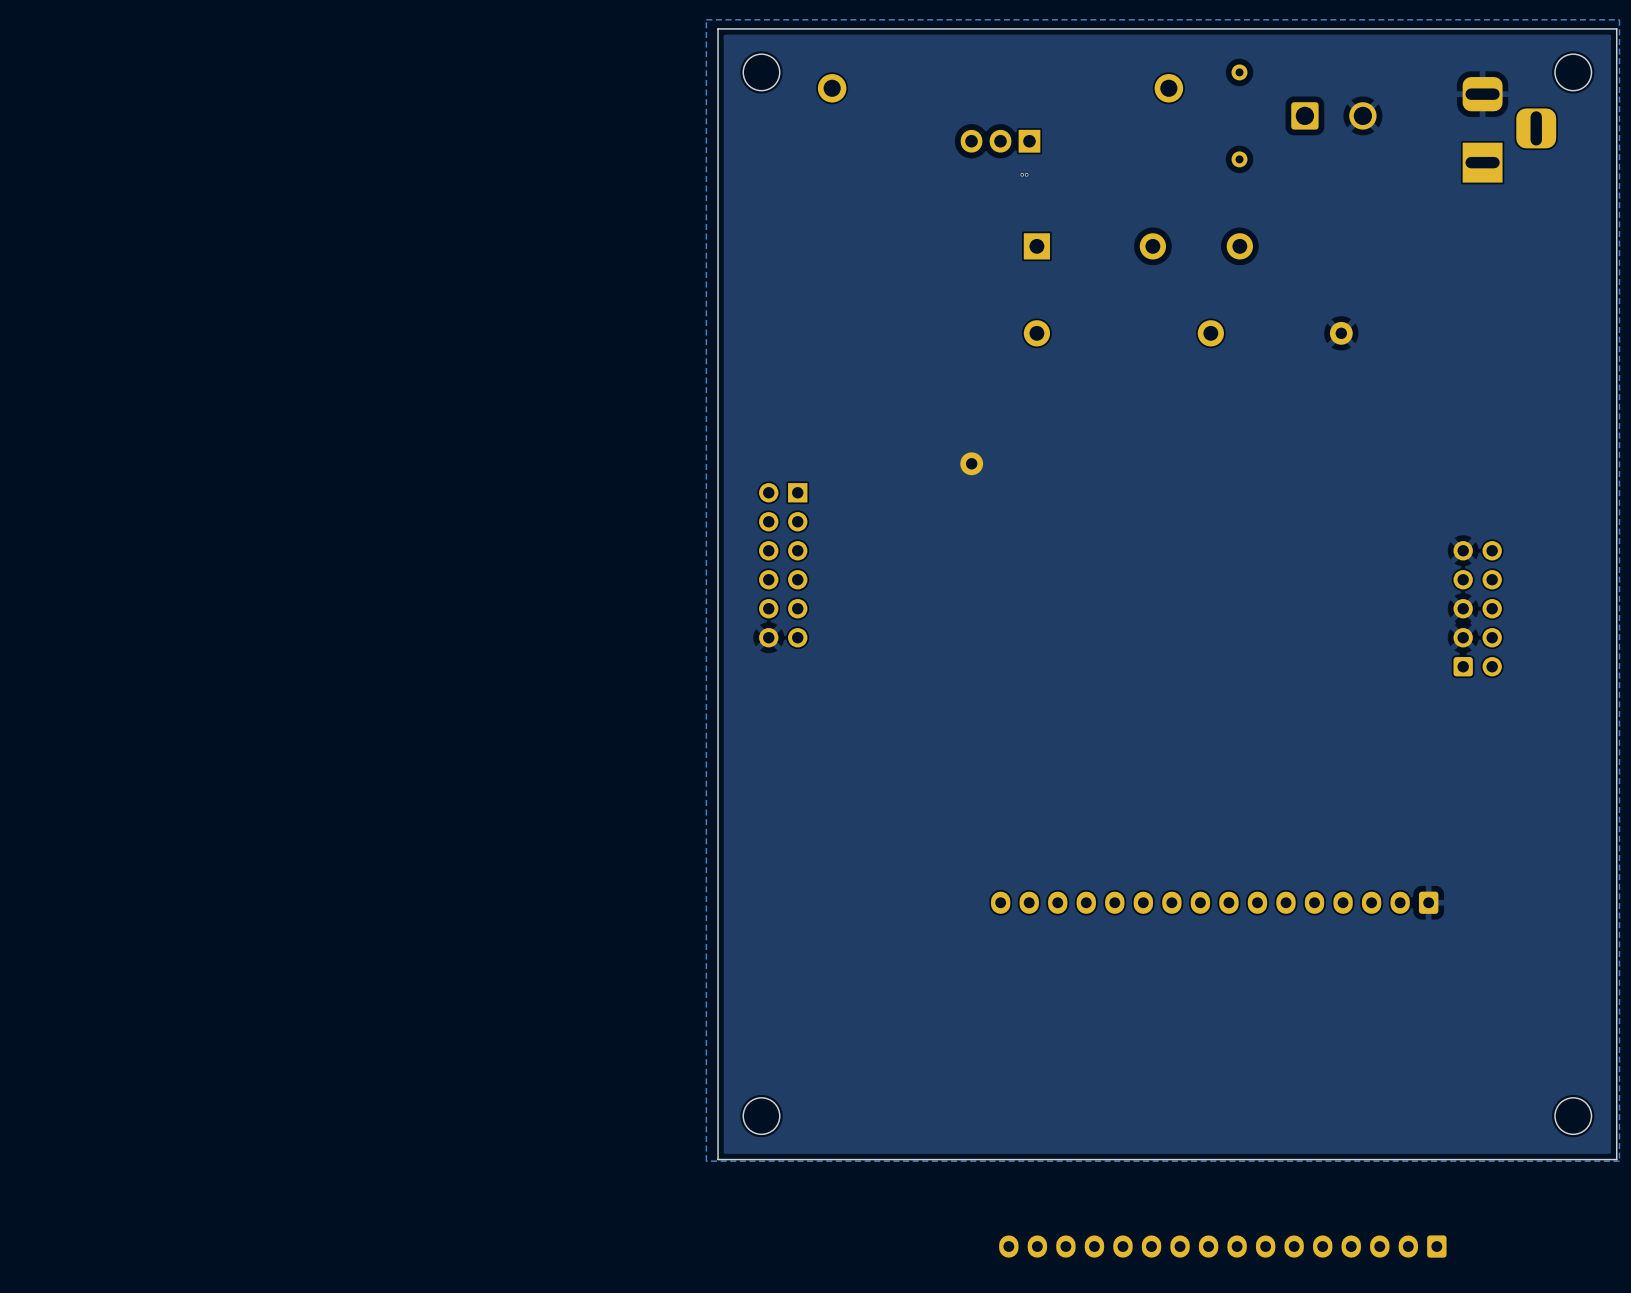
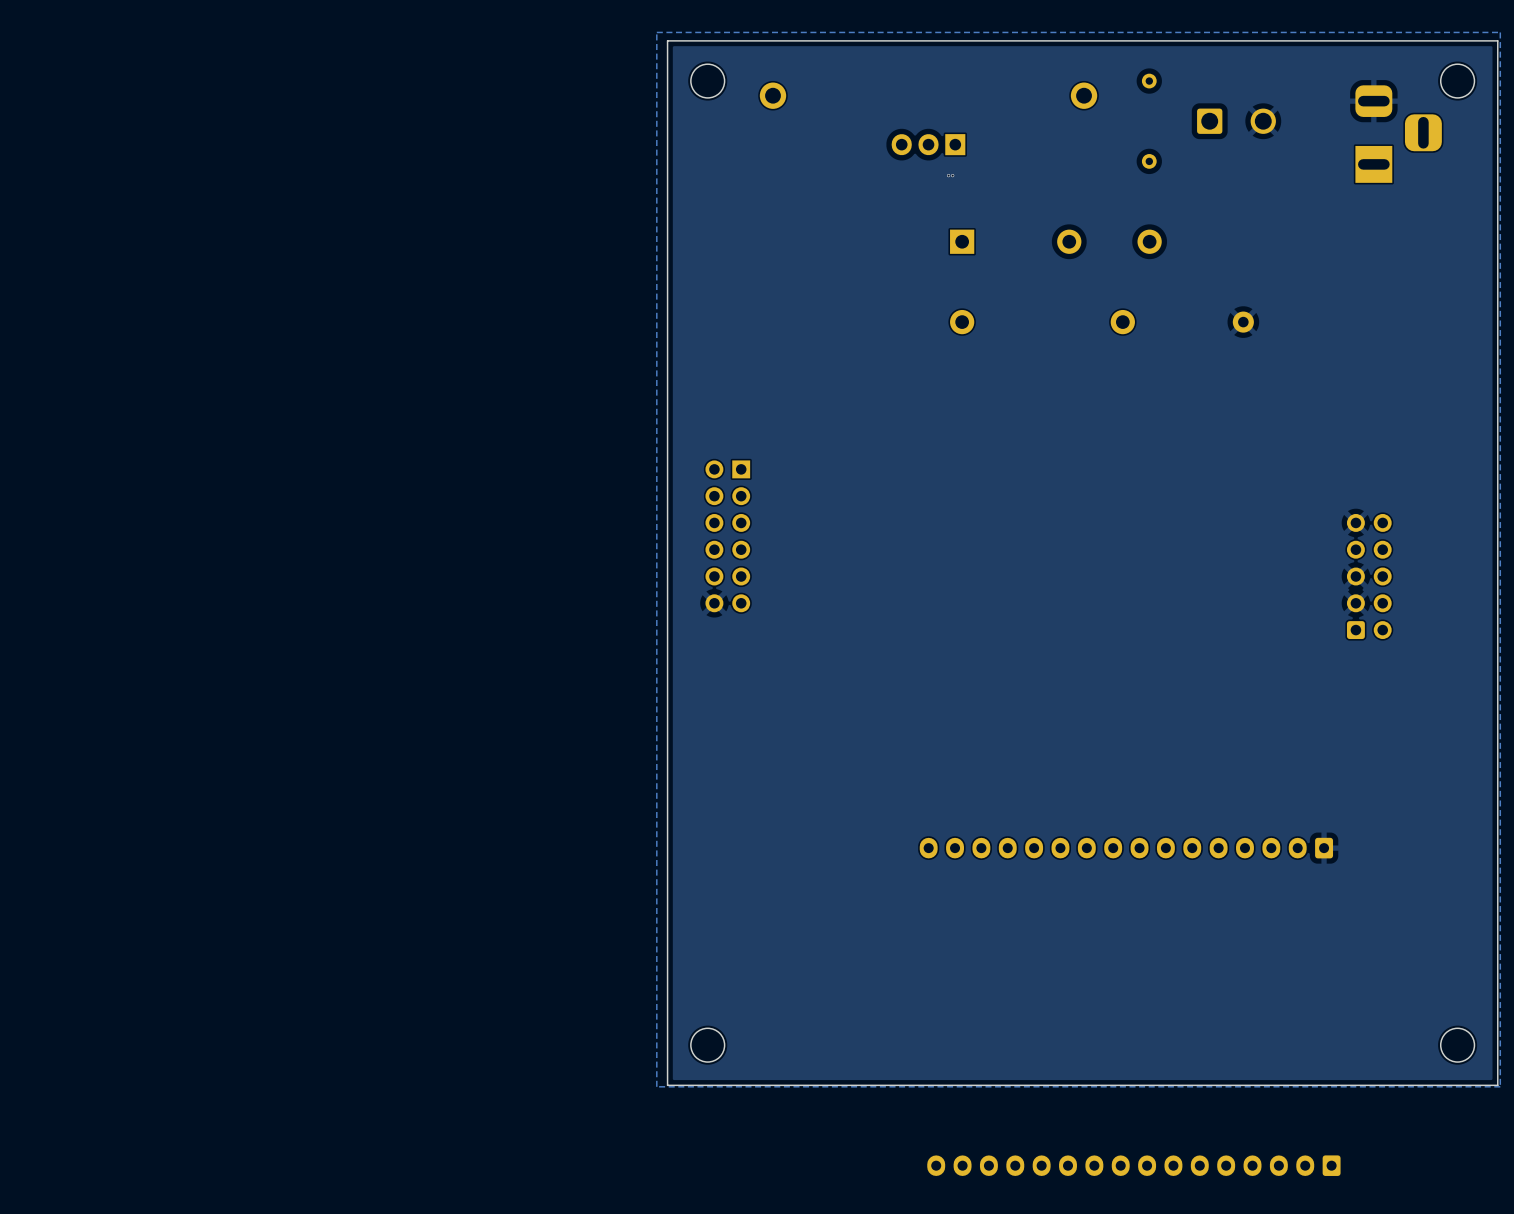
part: (971, 463) -> none

